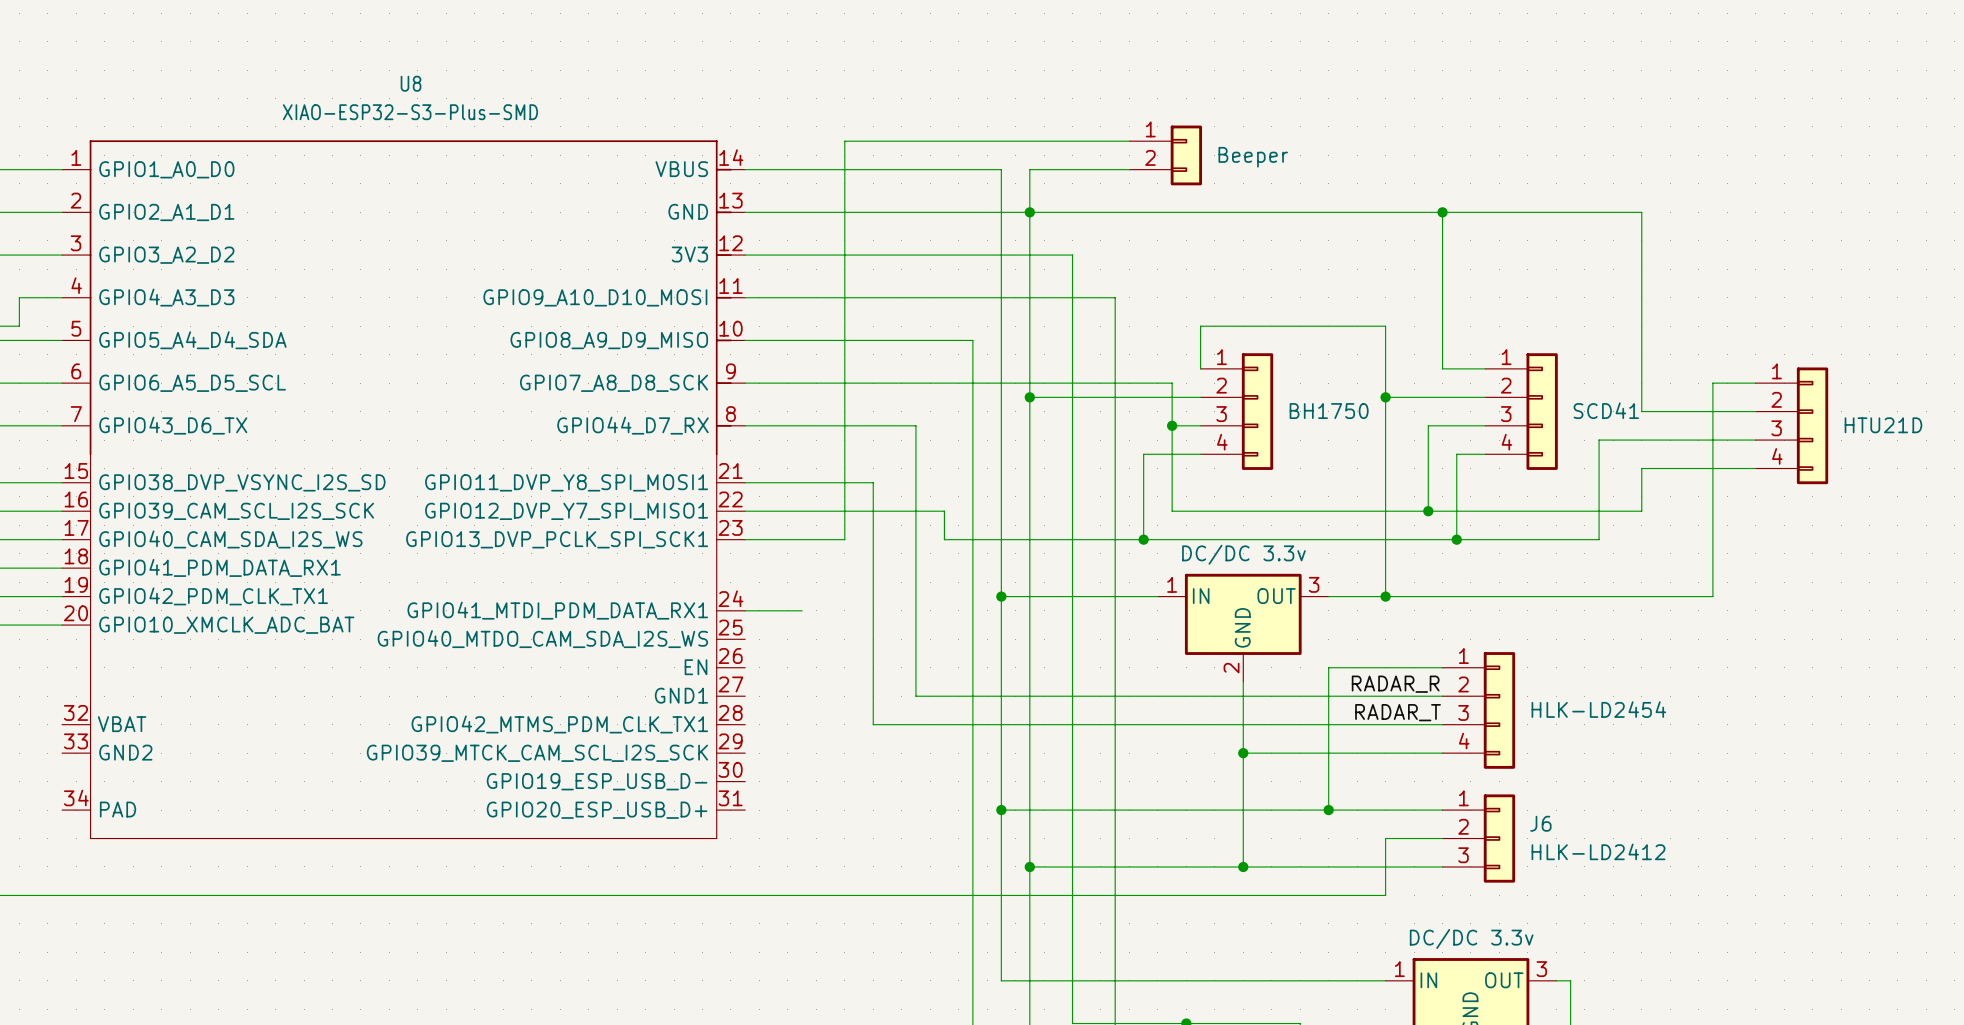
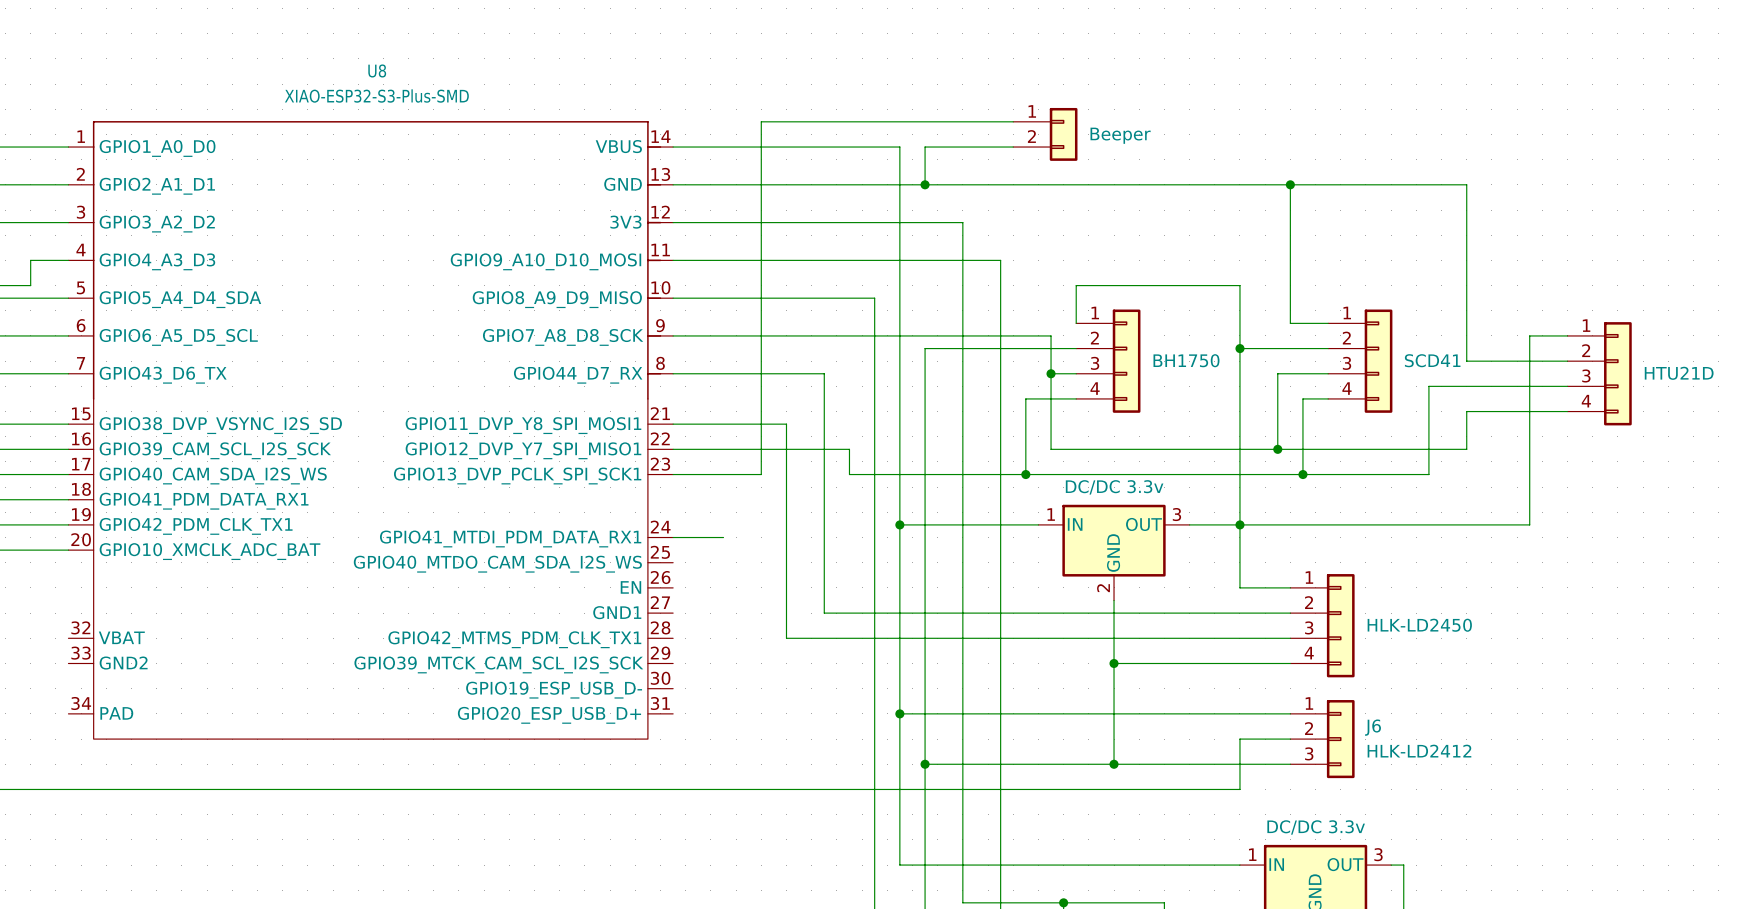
wire: (1029, 212) (1029, 397) -> none
junction: (1029, 397) -> none
wire: (1385, 667) (1328, 667) (1328, 810) -> (1239, 587) (1239, 524)
label: RADAR_R (1395, 684) -> none
part value: HLK-LD2454 (1598, 709) -> HLK-LD2450 (1419, 625)
label: RADAR_T (1398, 712) -> none
junction: (1328, 810) -> none

